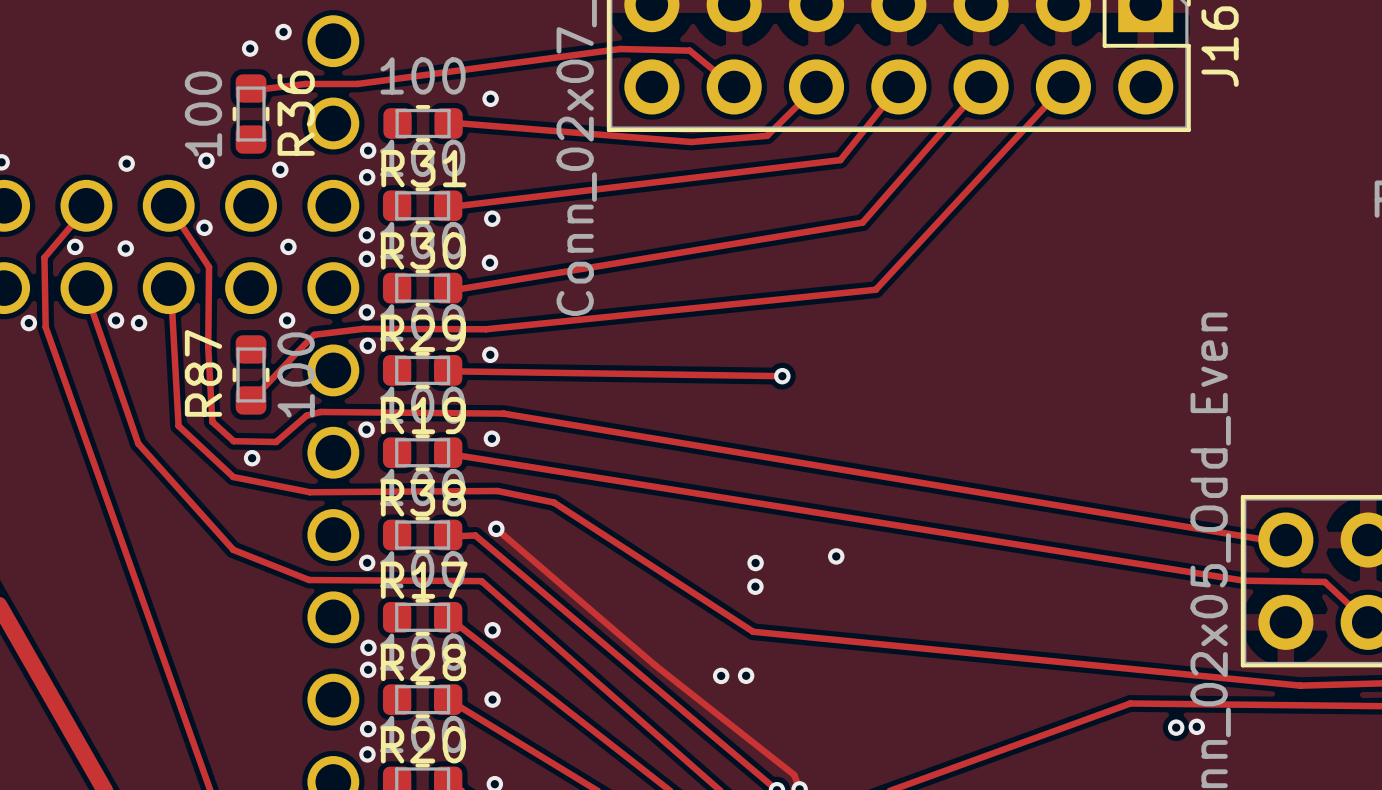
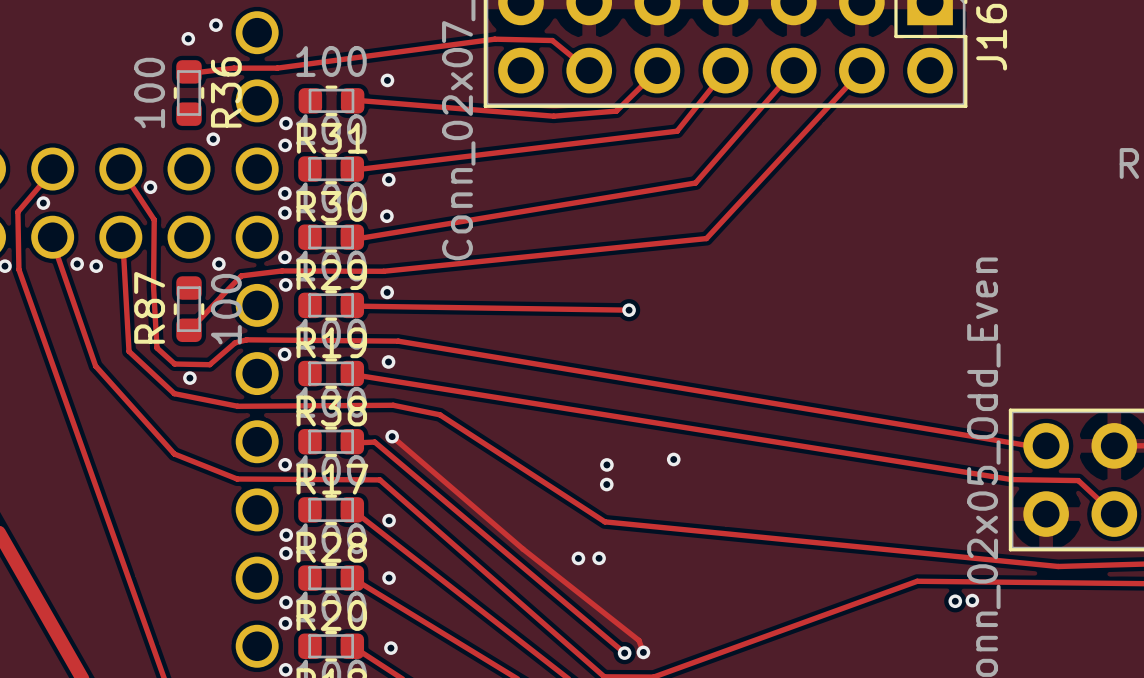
via: (206, 160) -> none
via: (126, 163) -> none
via: (288, 246) -> none
via: (125, 248) -> none

